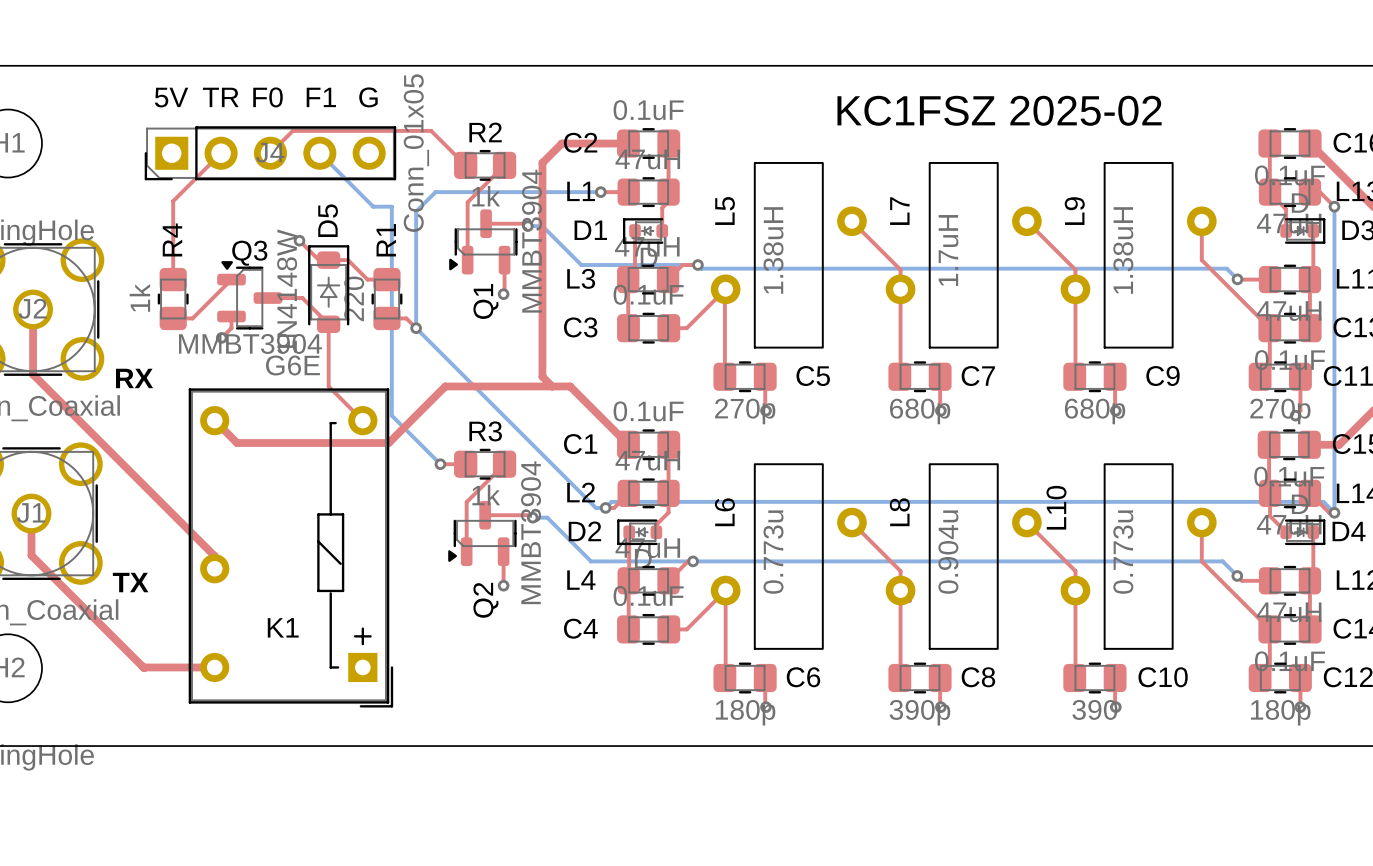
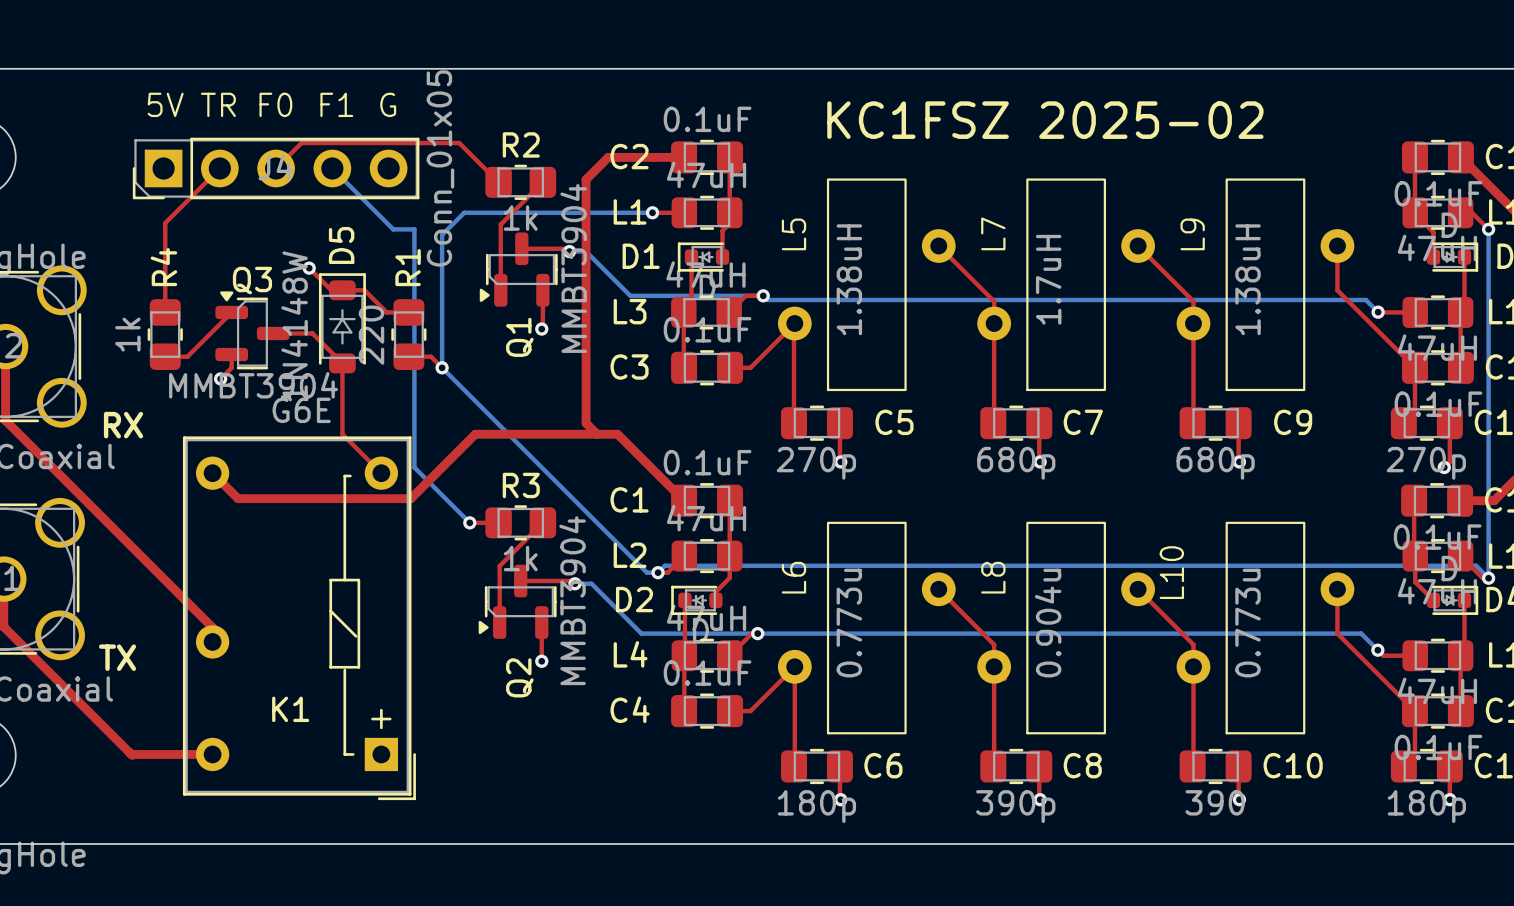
text position: KC1FSZ 2025-02 (999, 110) -> KC1FSZ 2025-02 (1045, 120)

